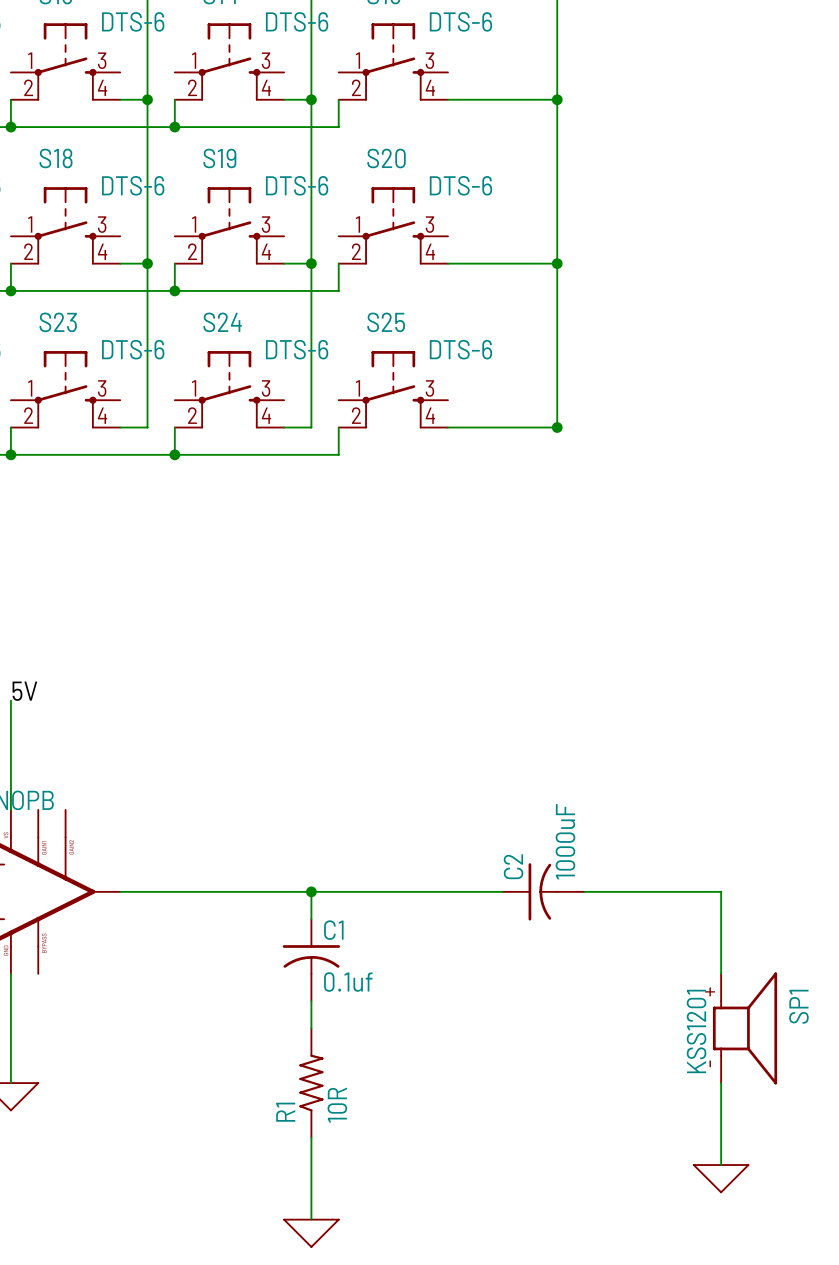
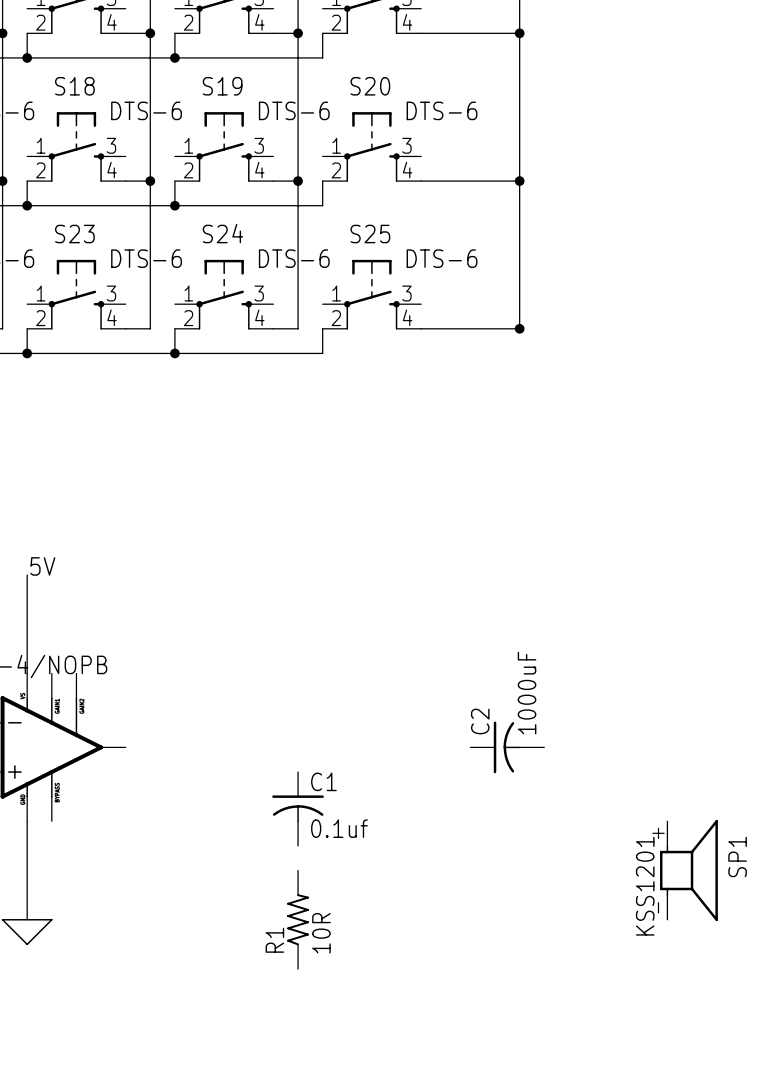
wire: (120, 891) (502, 891) -> none
wire: (311, 891) (311, 919) -> none
junction: (311, 891) -> none
wire: (584, 891) (721, 891) (721, 973) -> none
wire: (311, 1001) (311, 1028) -> none
wire: (721, 1083) (721, 1165) -> none
wire: (311, 1137) (311, 1219) -> none
power symbol: (721, 1178) -> none
power symbol: (311, 1233) -> none

